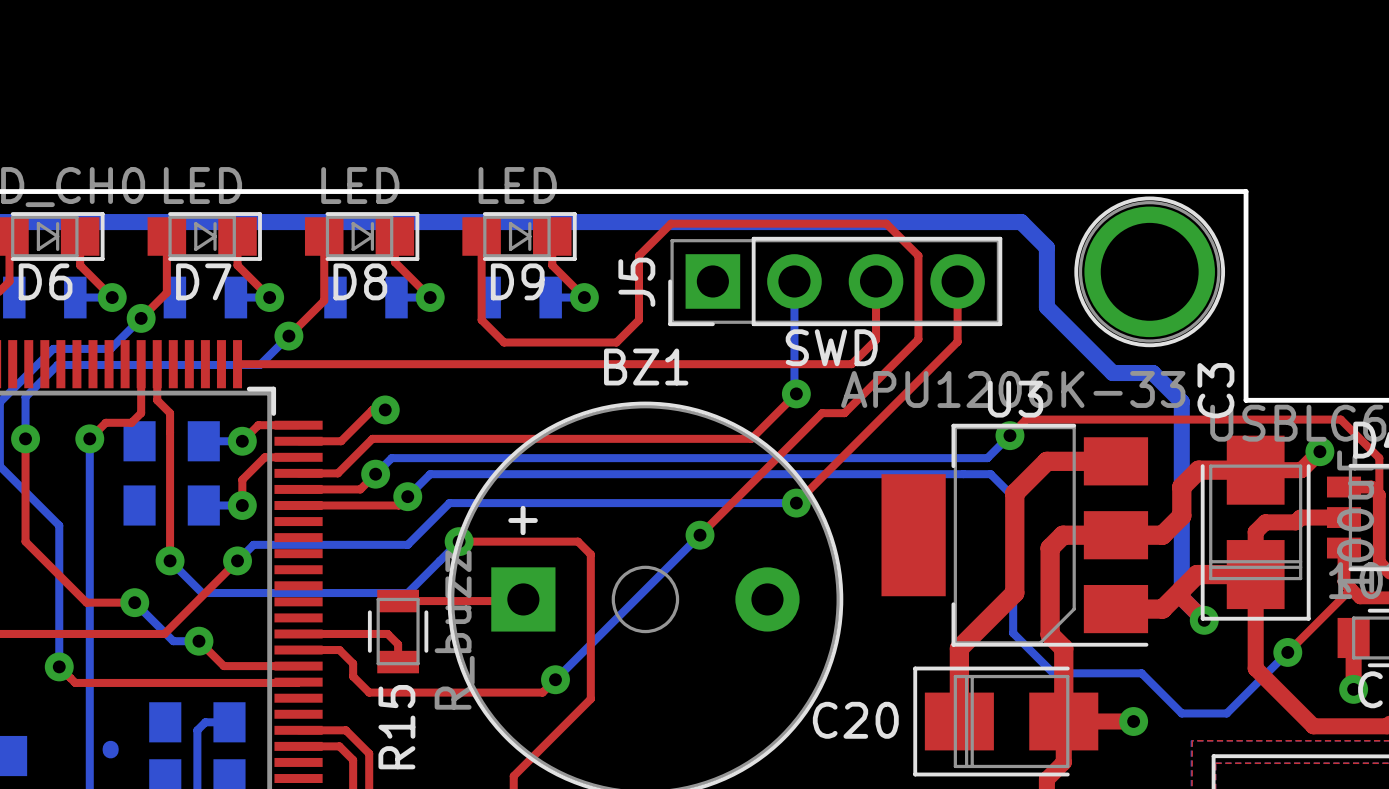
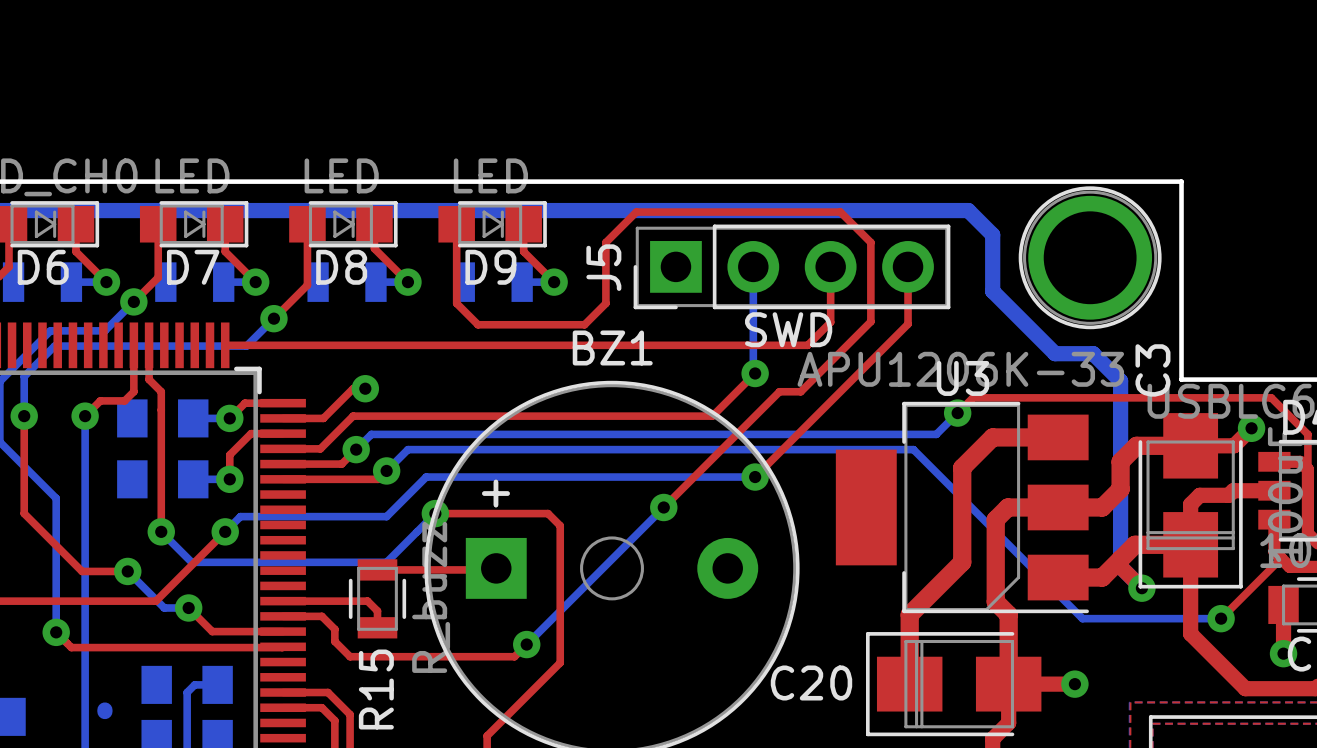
bottom track: (963, 474) (990, 474) (1013, 496) (1013, 633) (1053, 673) (1141, 673) (1181, 713) (1226, 713) (1287, 652) -> (913, 449) (1082, 618) (1221, 618)

